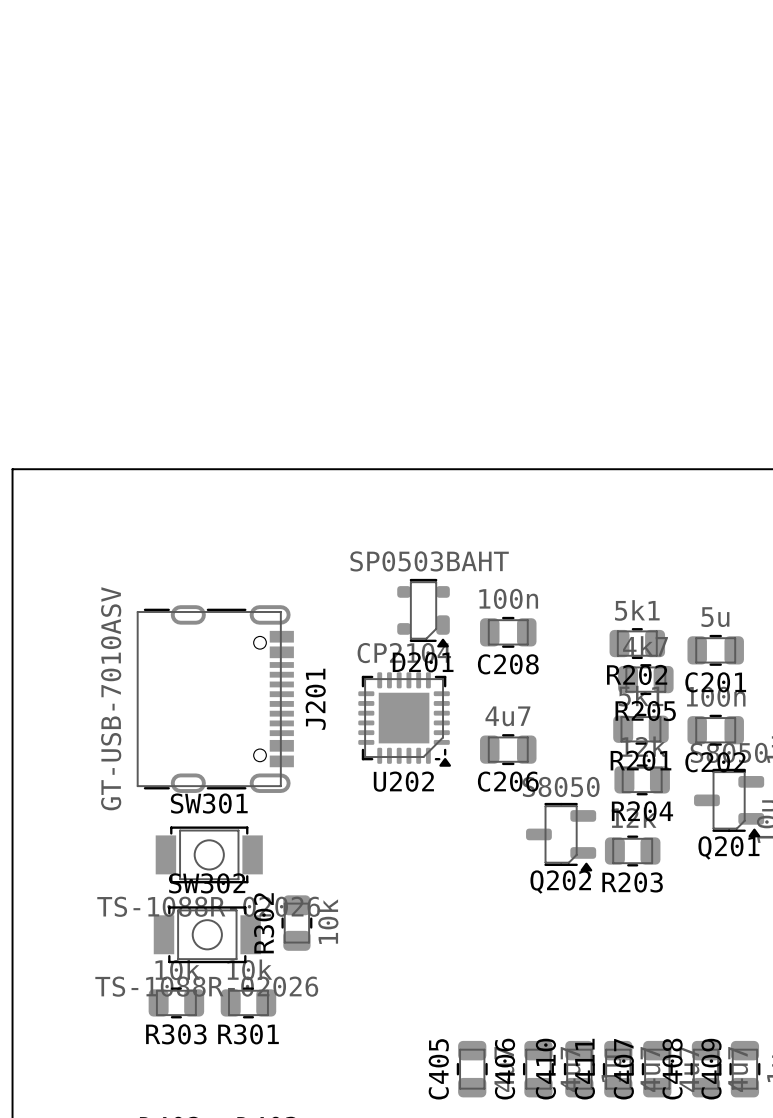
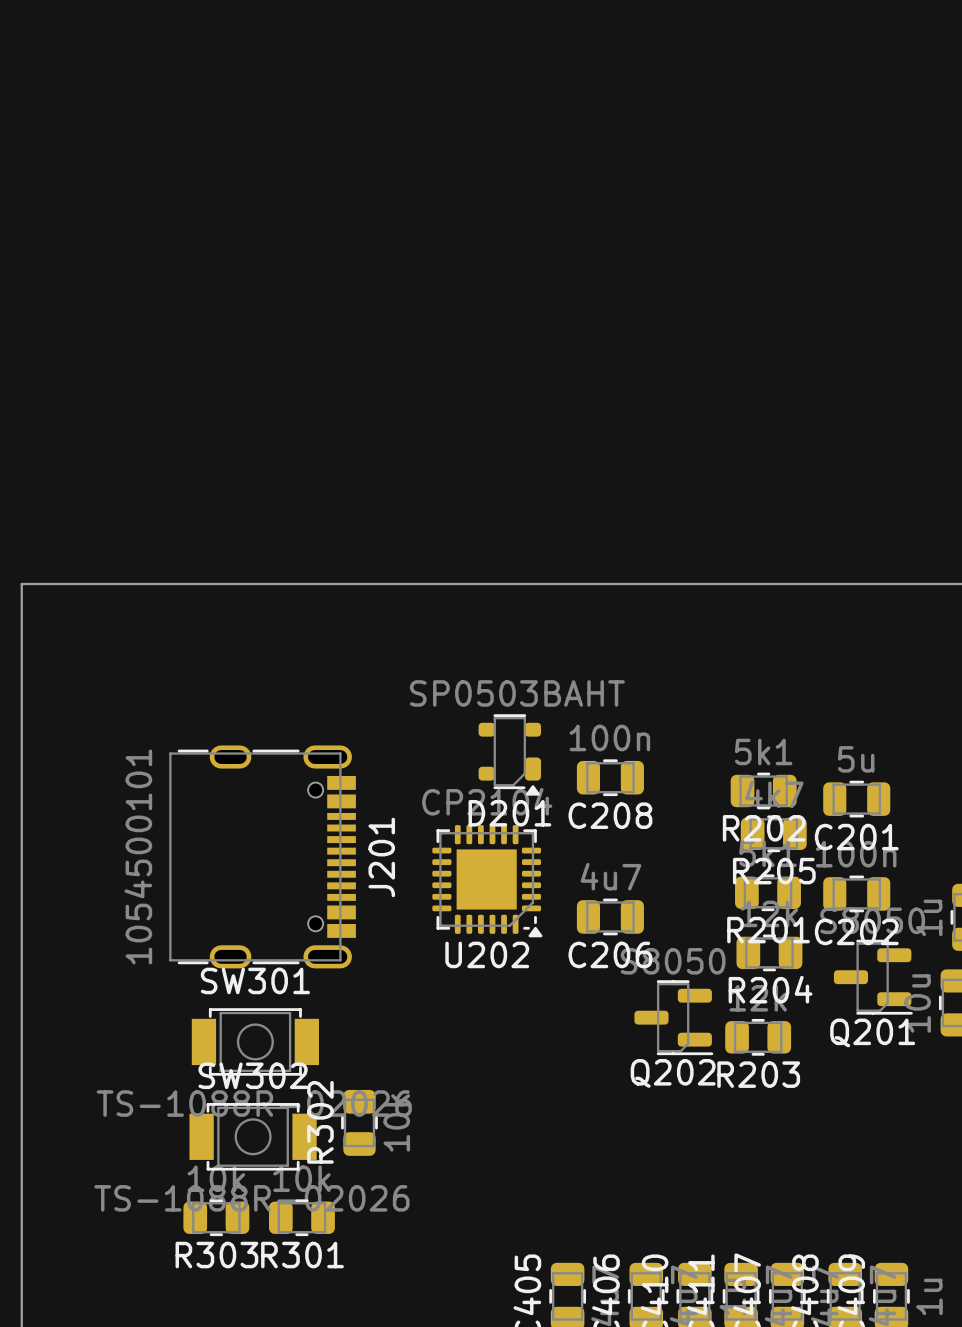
J201 value: GT-USB-7010ASV (111, 698) -> 1054500101 (138, 856)
Q201 footprint: [694, 768, 765, 838] -> [833, 939, 913, 1015]
Q202 footprint: [526, 802, 597, 872] -> [634, 980, 714, 1056]

